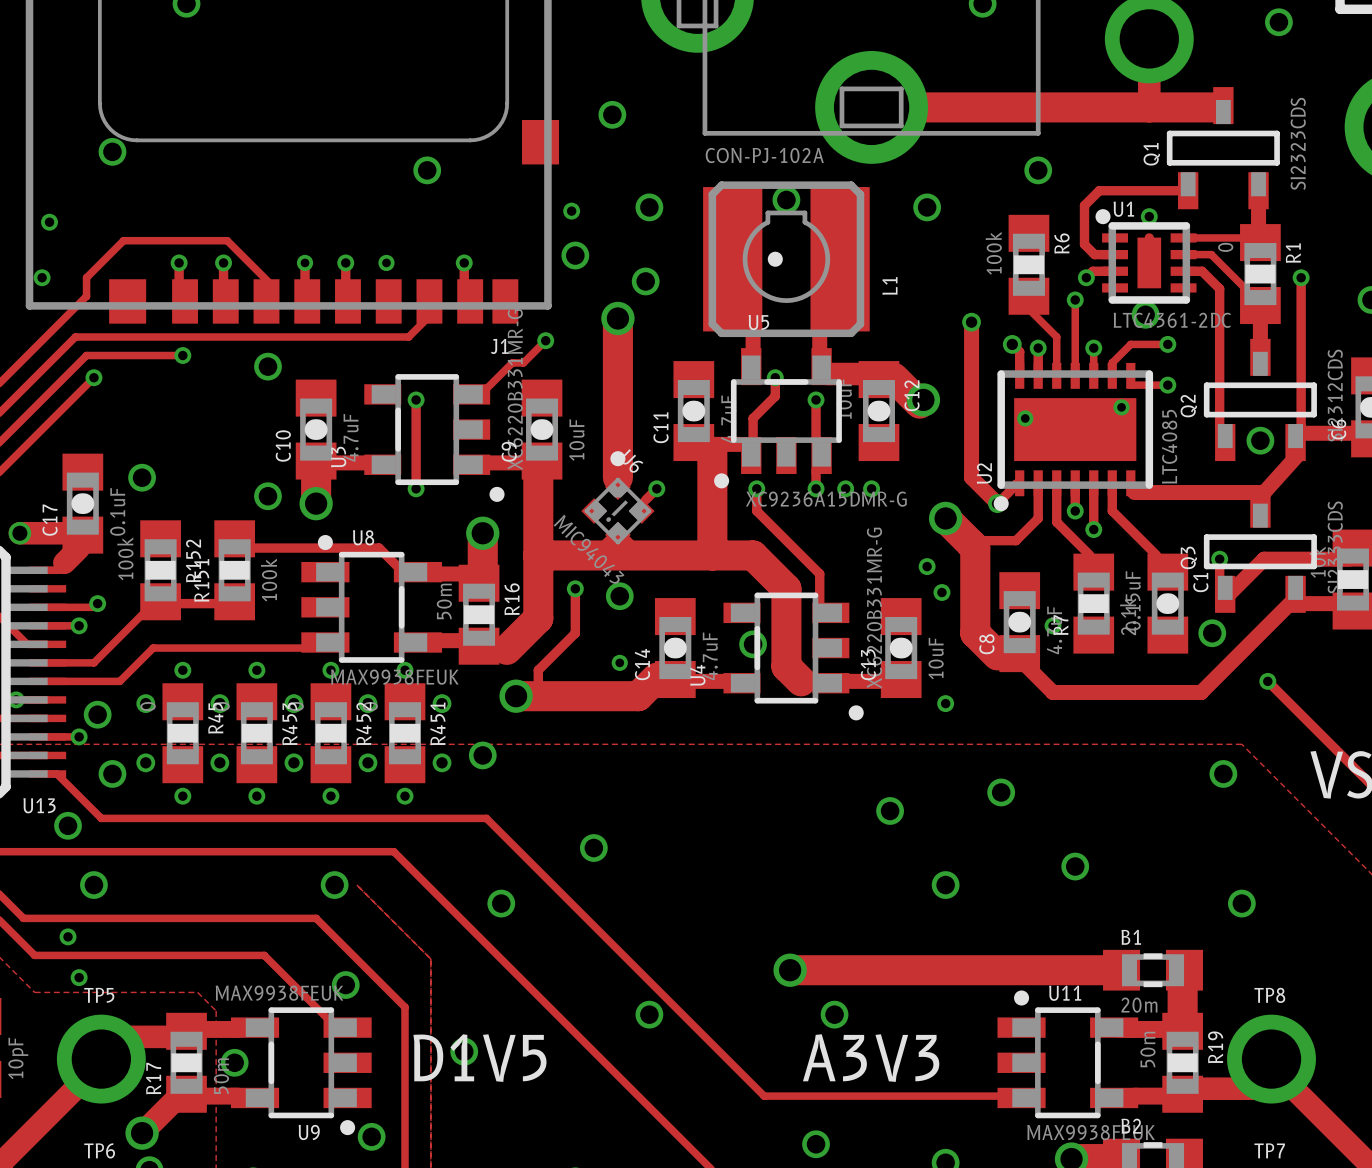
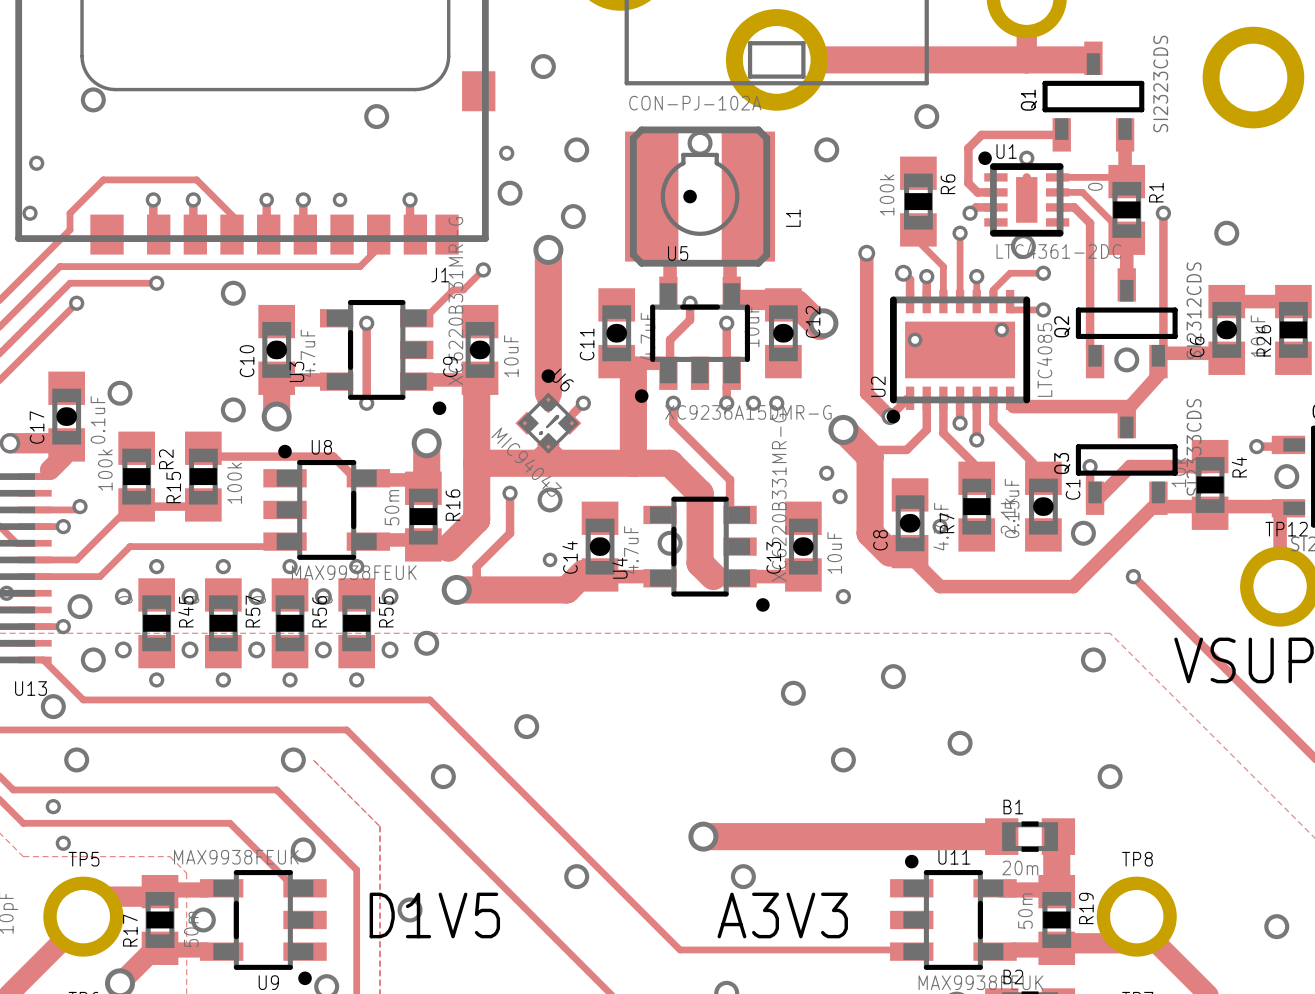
R152 name: R152 (193, 560) -> R2 (166, 459)
R151 name: R151 (201, 580) -> R15 (173, 487)
R453 name: R453 (289, 723) -> R57 (252, 611)
R452 name: R452 (363, 723) -> R56 (319, 611)
R451 name: R451 (437, 723) -> R55 (386, 611)

